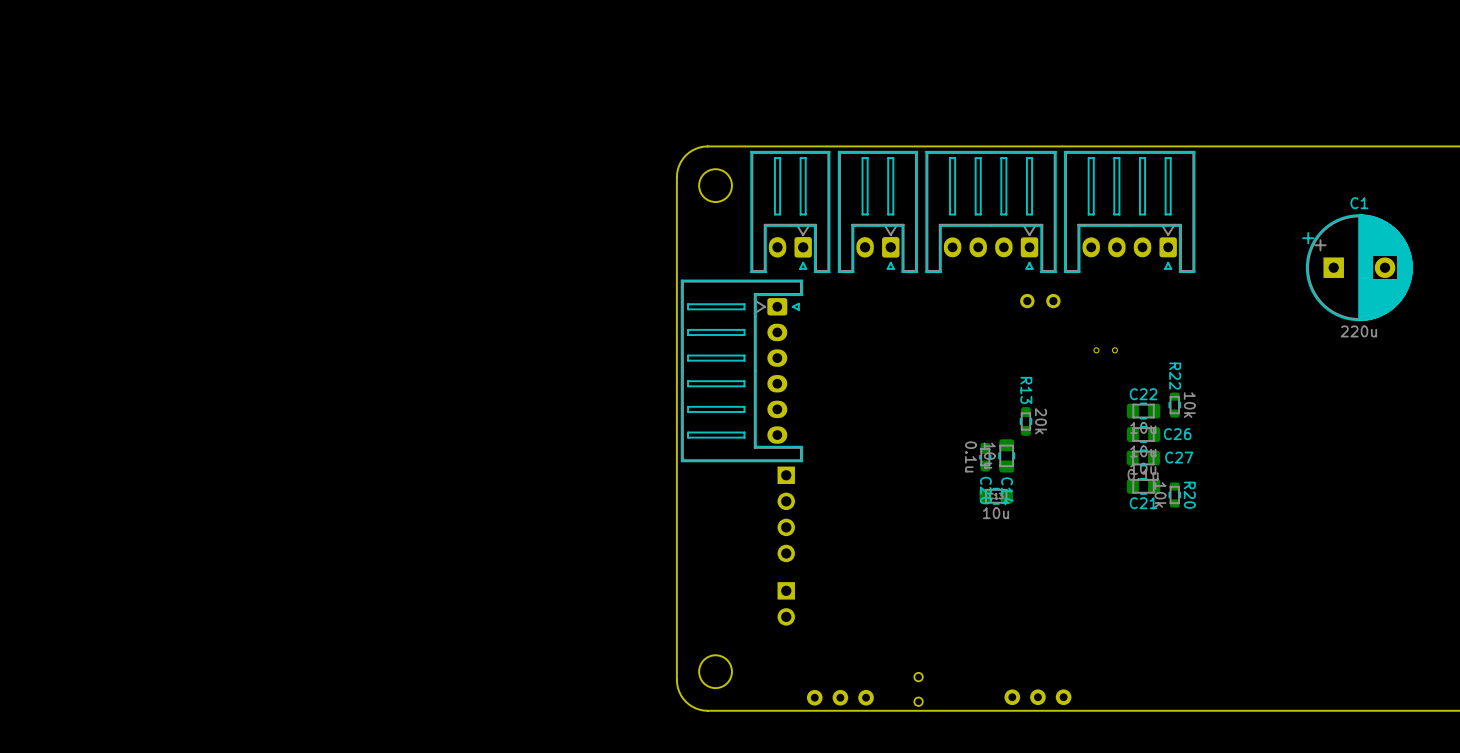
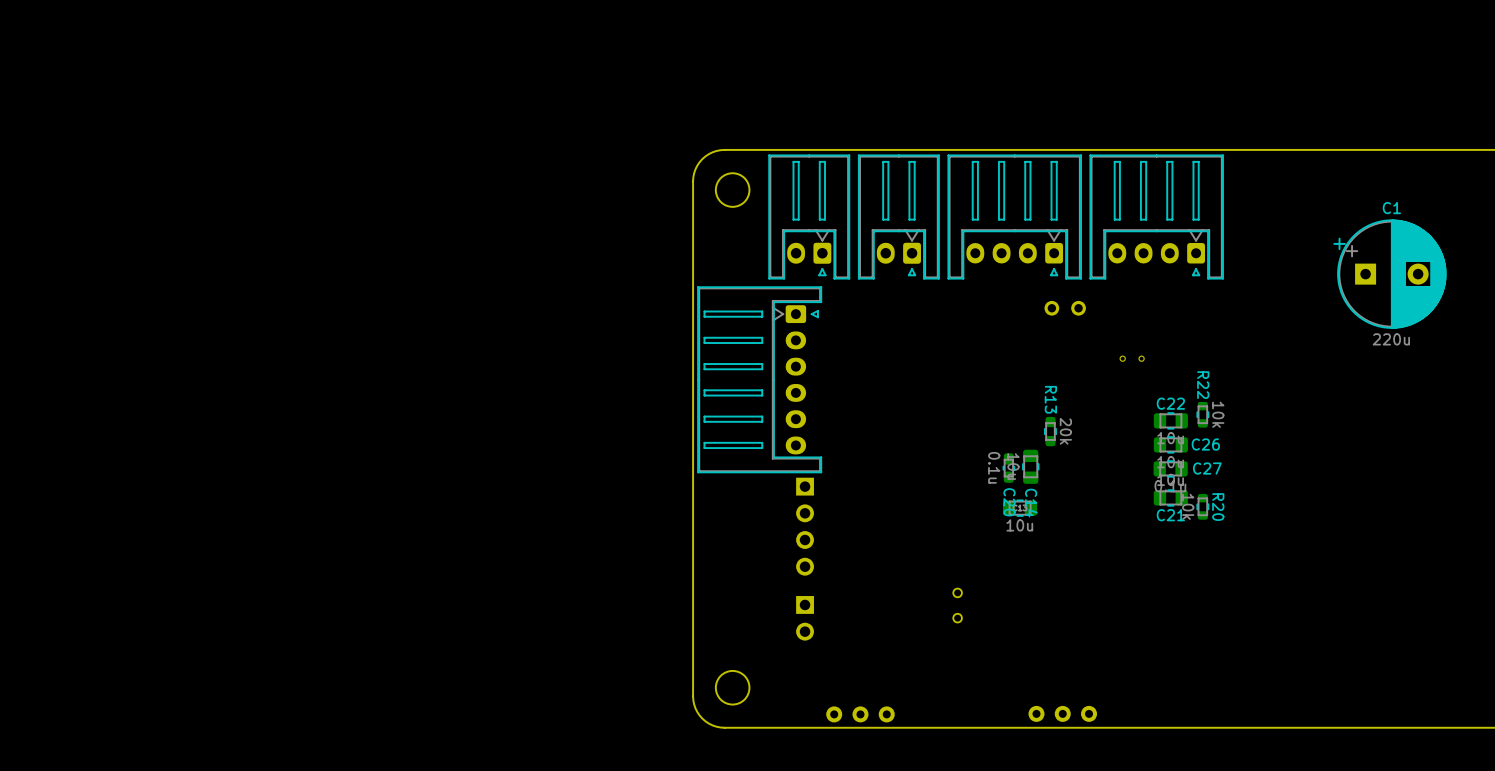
part position: (918, 689) -> (957, 605)

